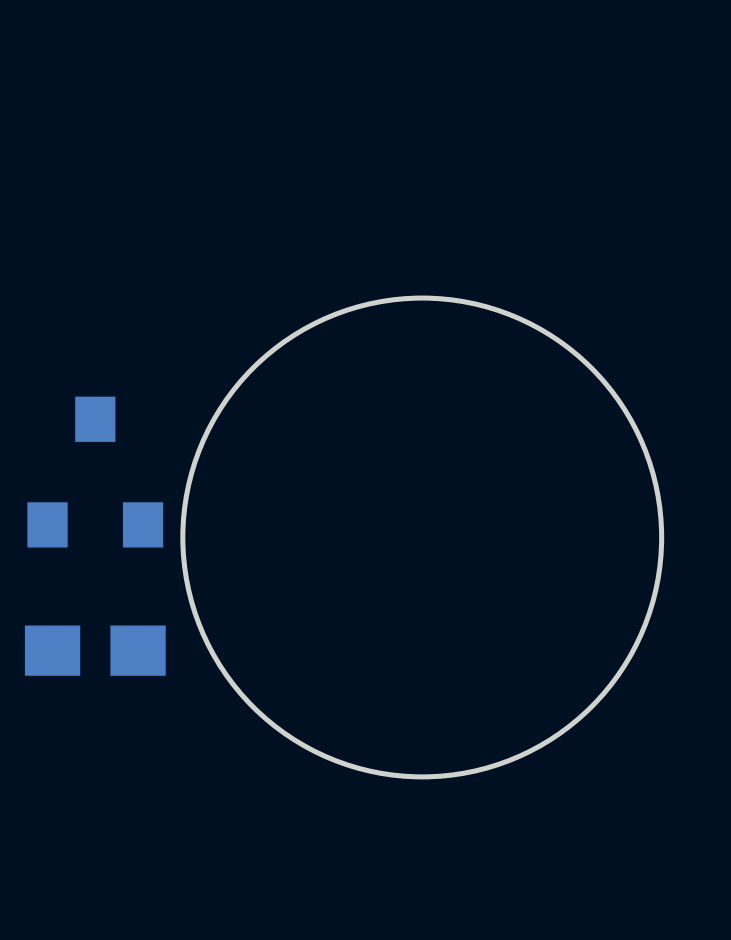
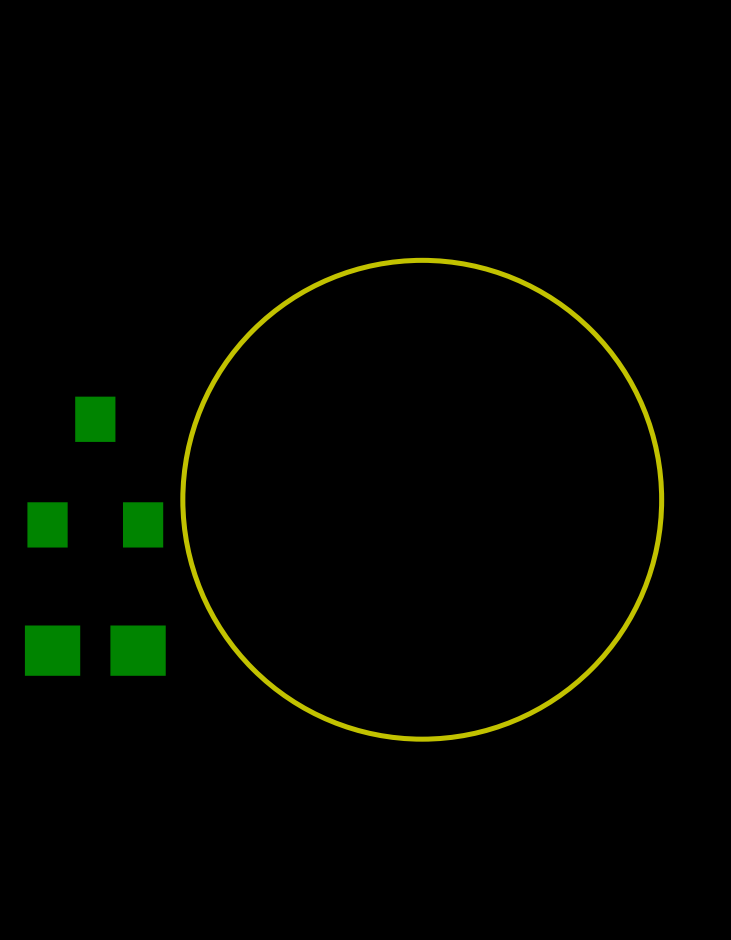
round board edge position: (422, 537) -> (422, 499)

